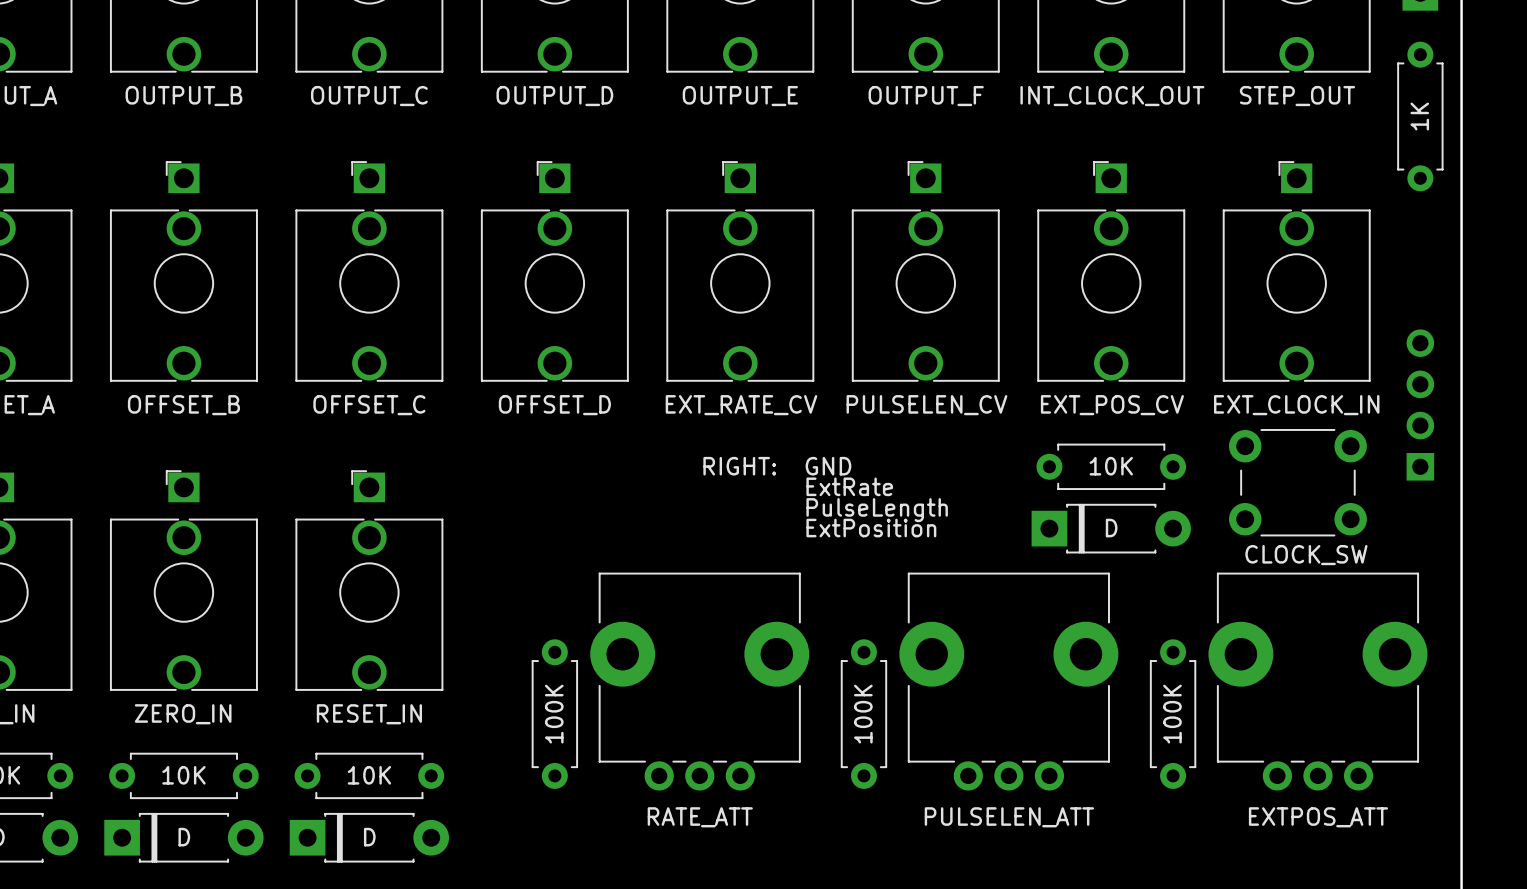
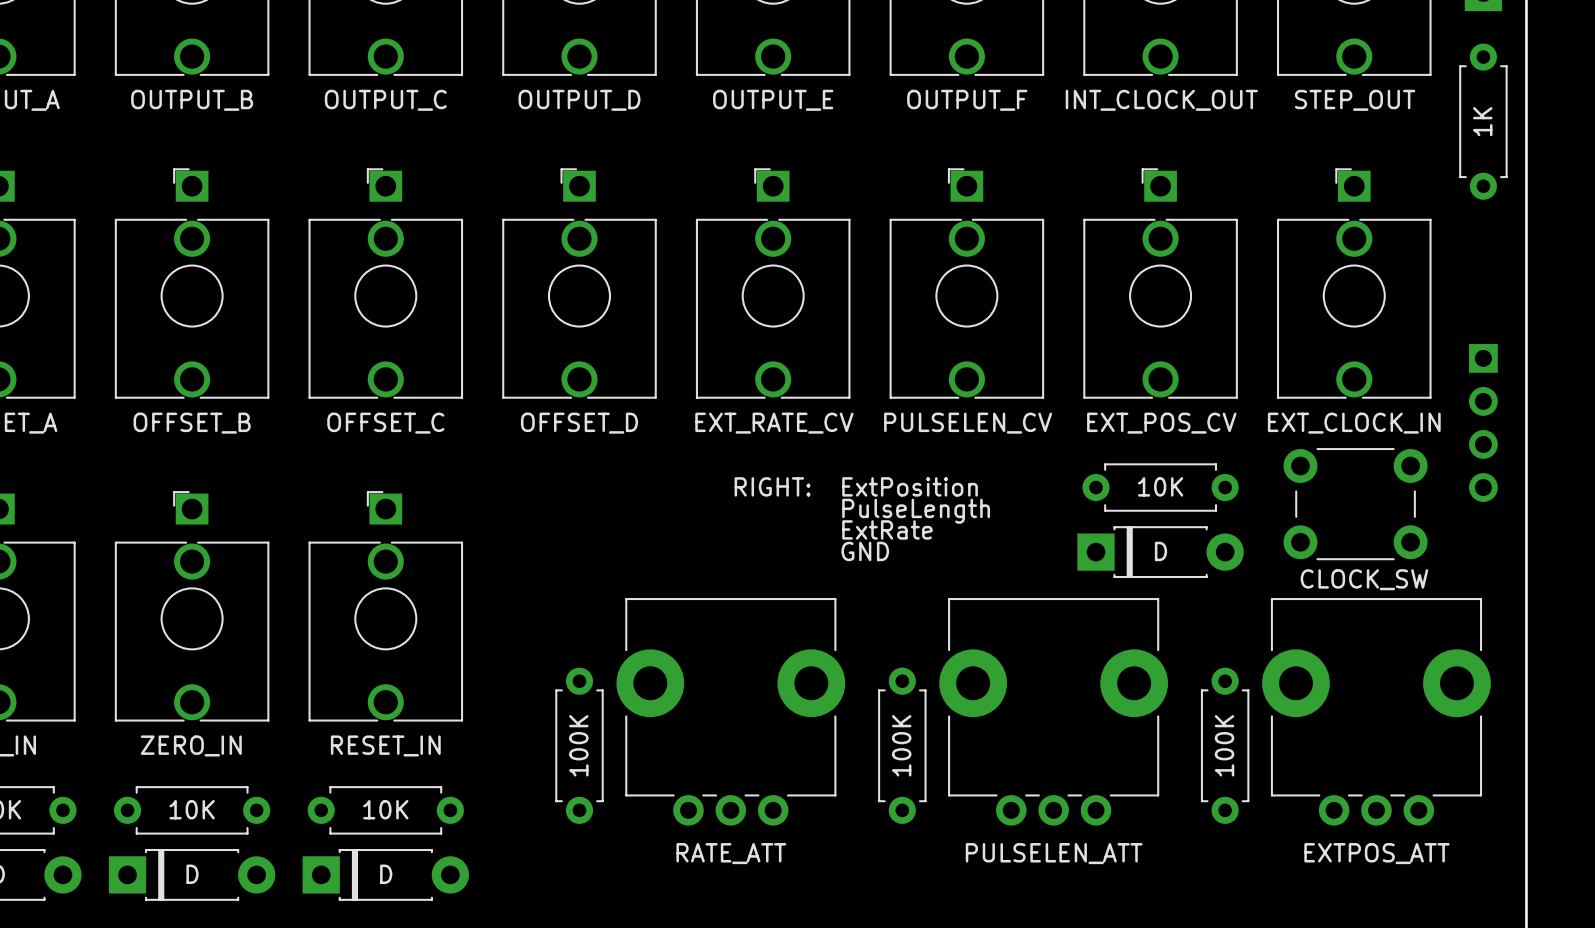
part rotation: 0° (1420, 404) -> 180° (1483, 422)
text: GND (828, 466) -> ExtPosition (910, 486)
text: ExtRate (849, 486) -> PulseLength (916, 511)
text: PulseLength (877, 510) -> ExtRate (887, 529)
text: ExtPosition (871, 528) -> GND (865, 551)

